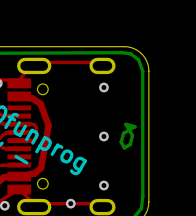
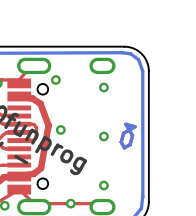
top track: (102, 62) (34, 62) -> none
via: none -> (55, 79)
via: none -> (60, 129)

